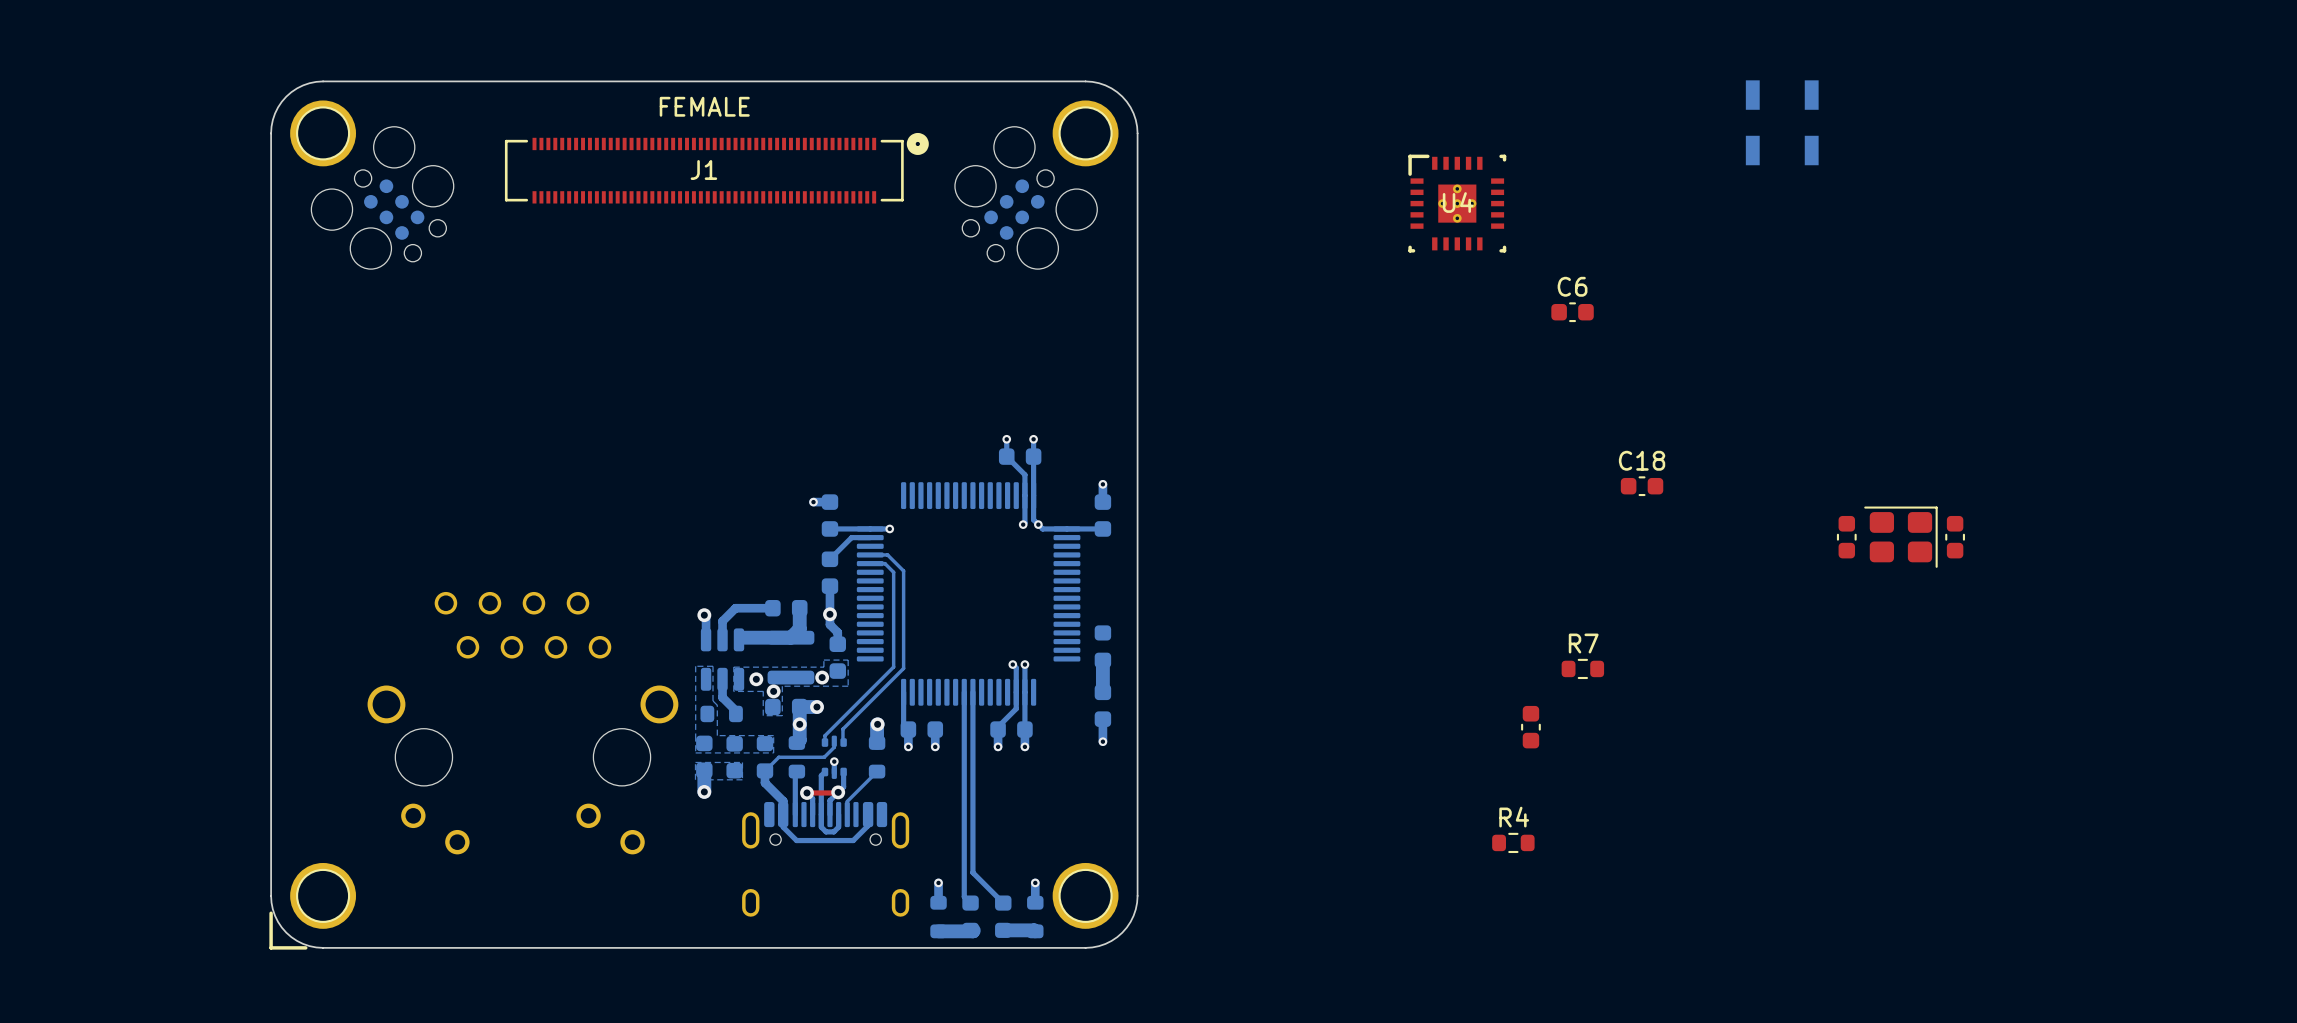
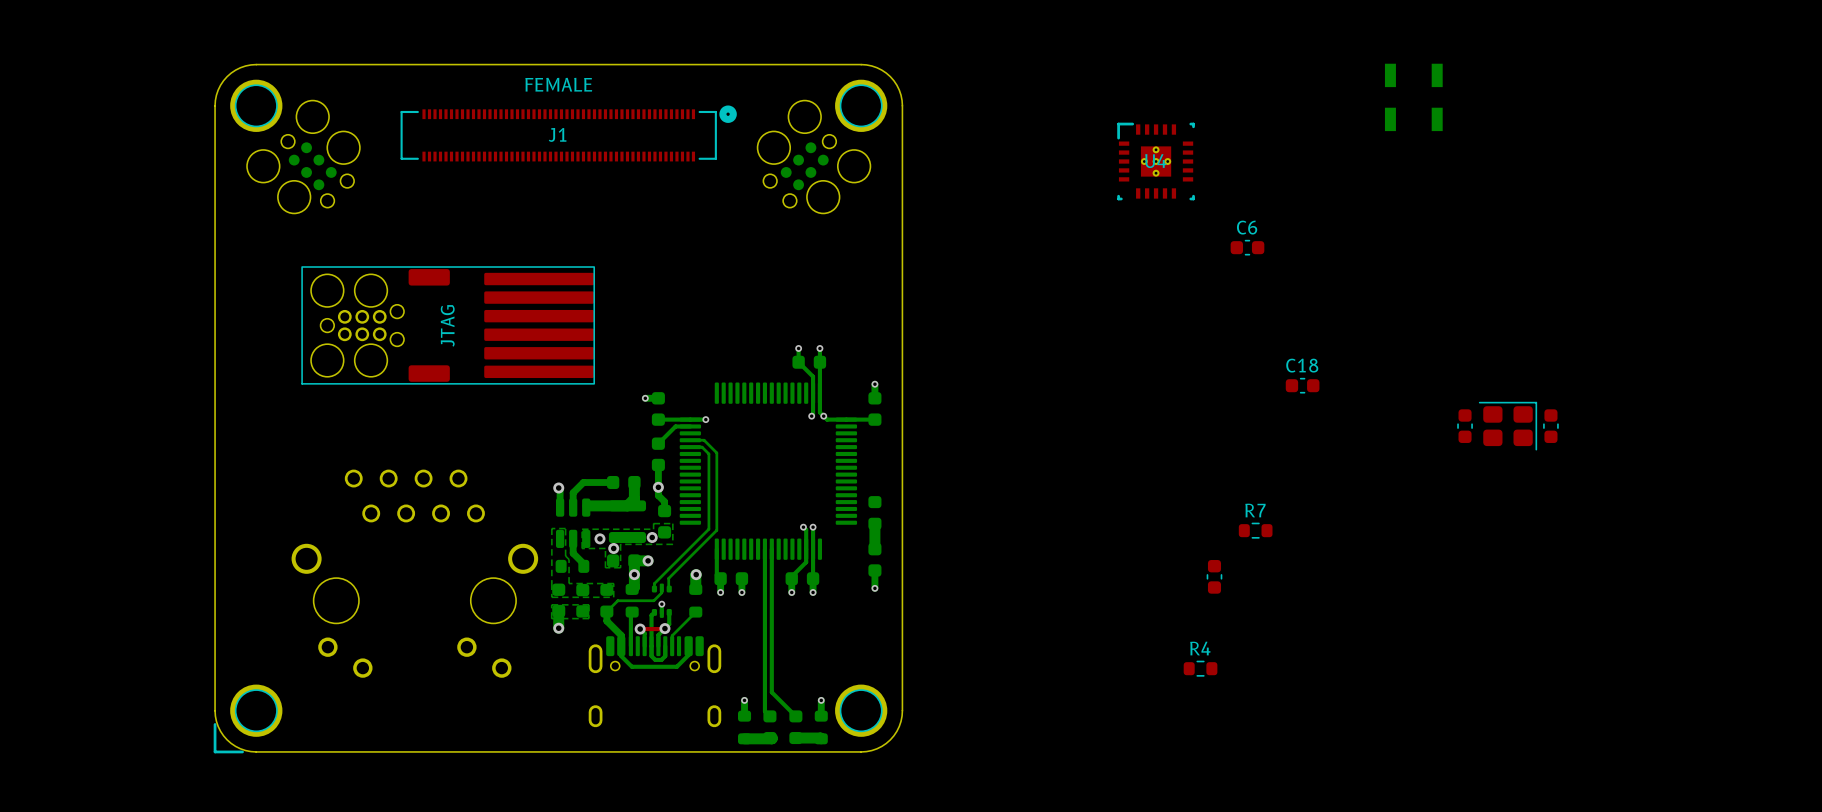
JTAG: none -> (448, 325)

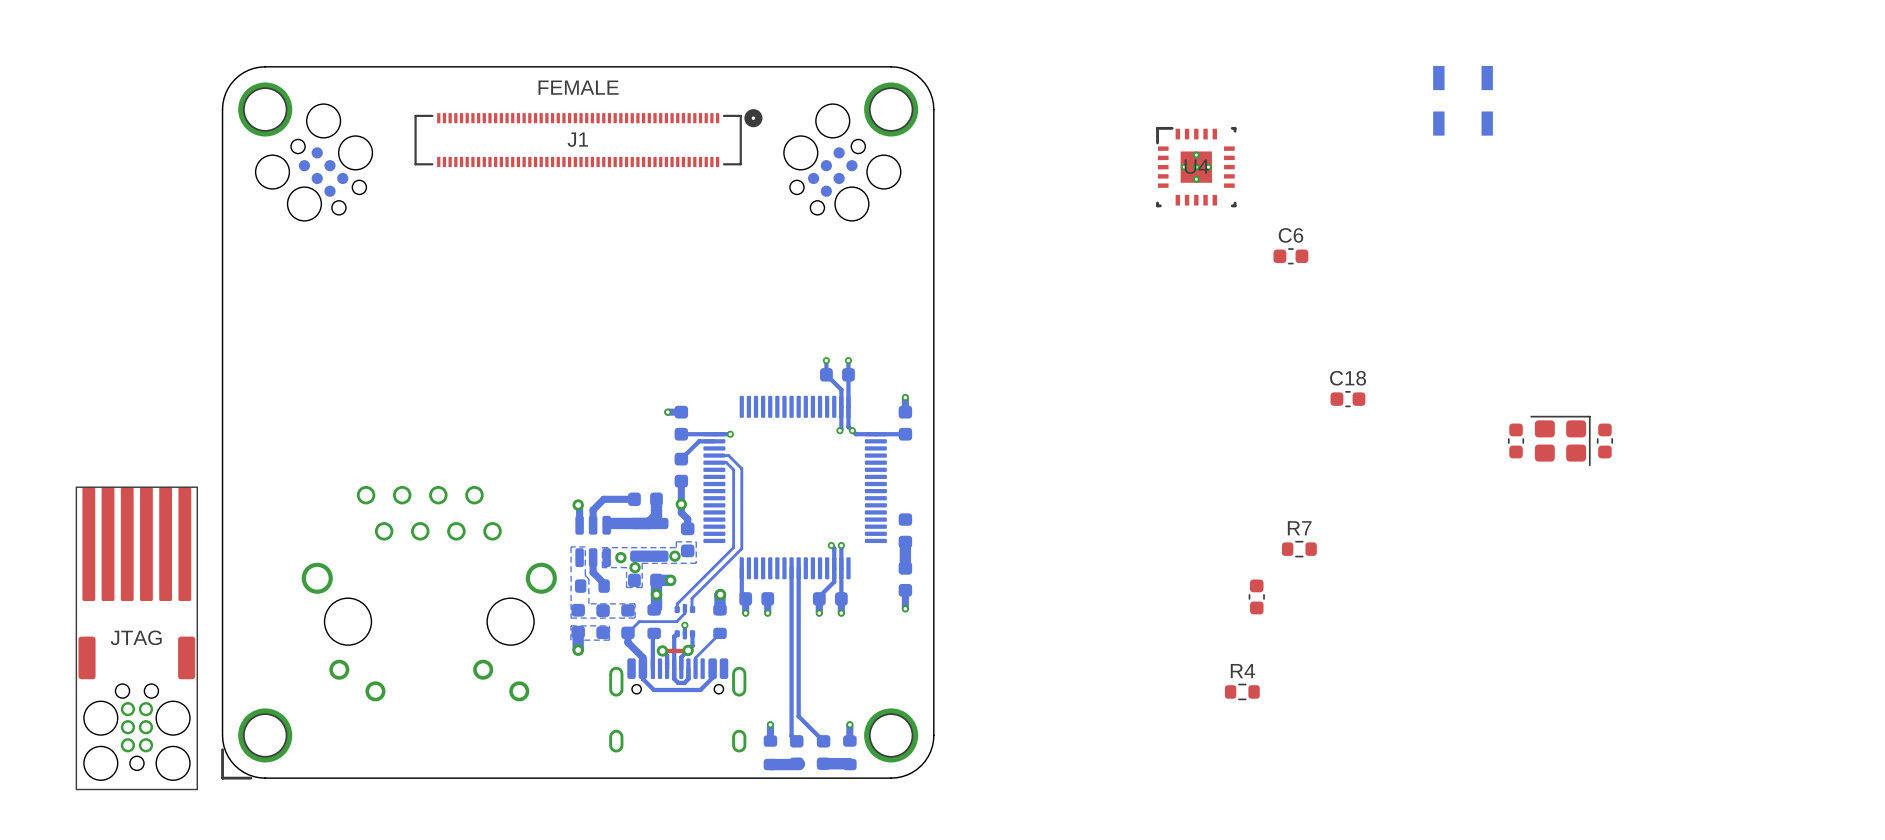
JTAG: (448, 325) -> none
JTAG: none -> (136, 638)

